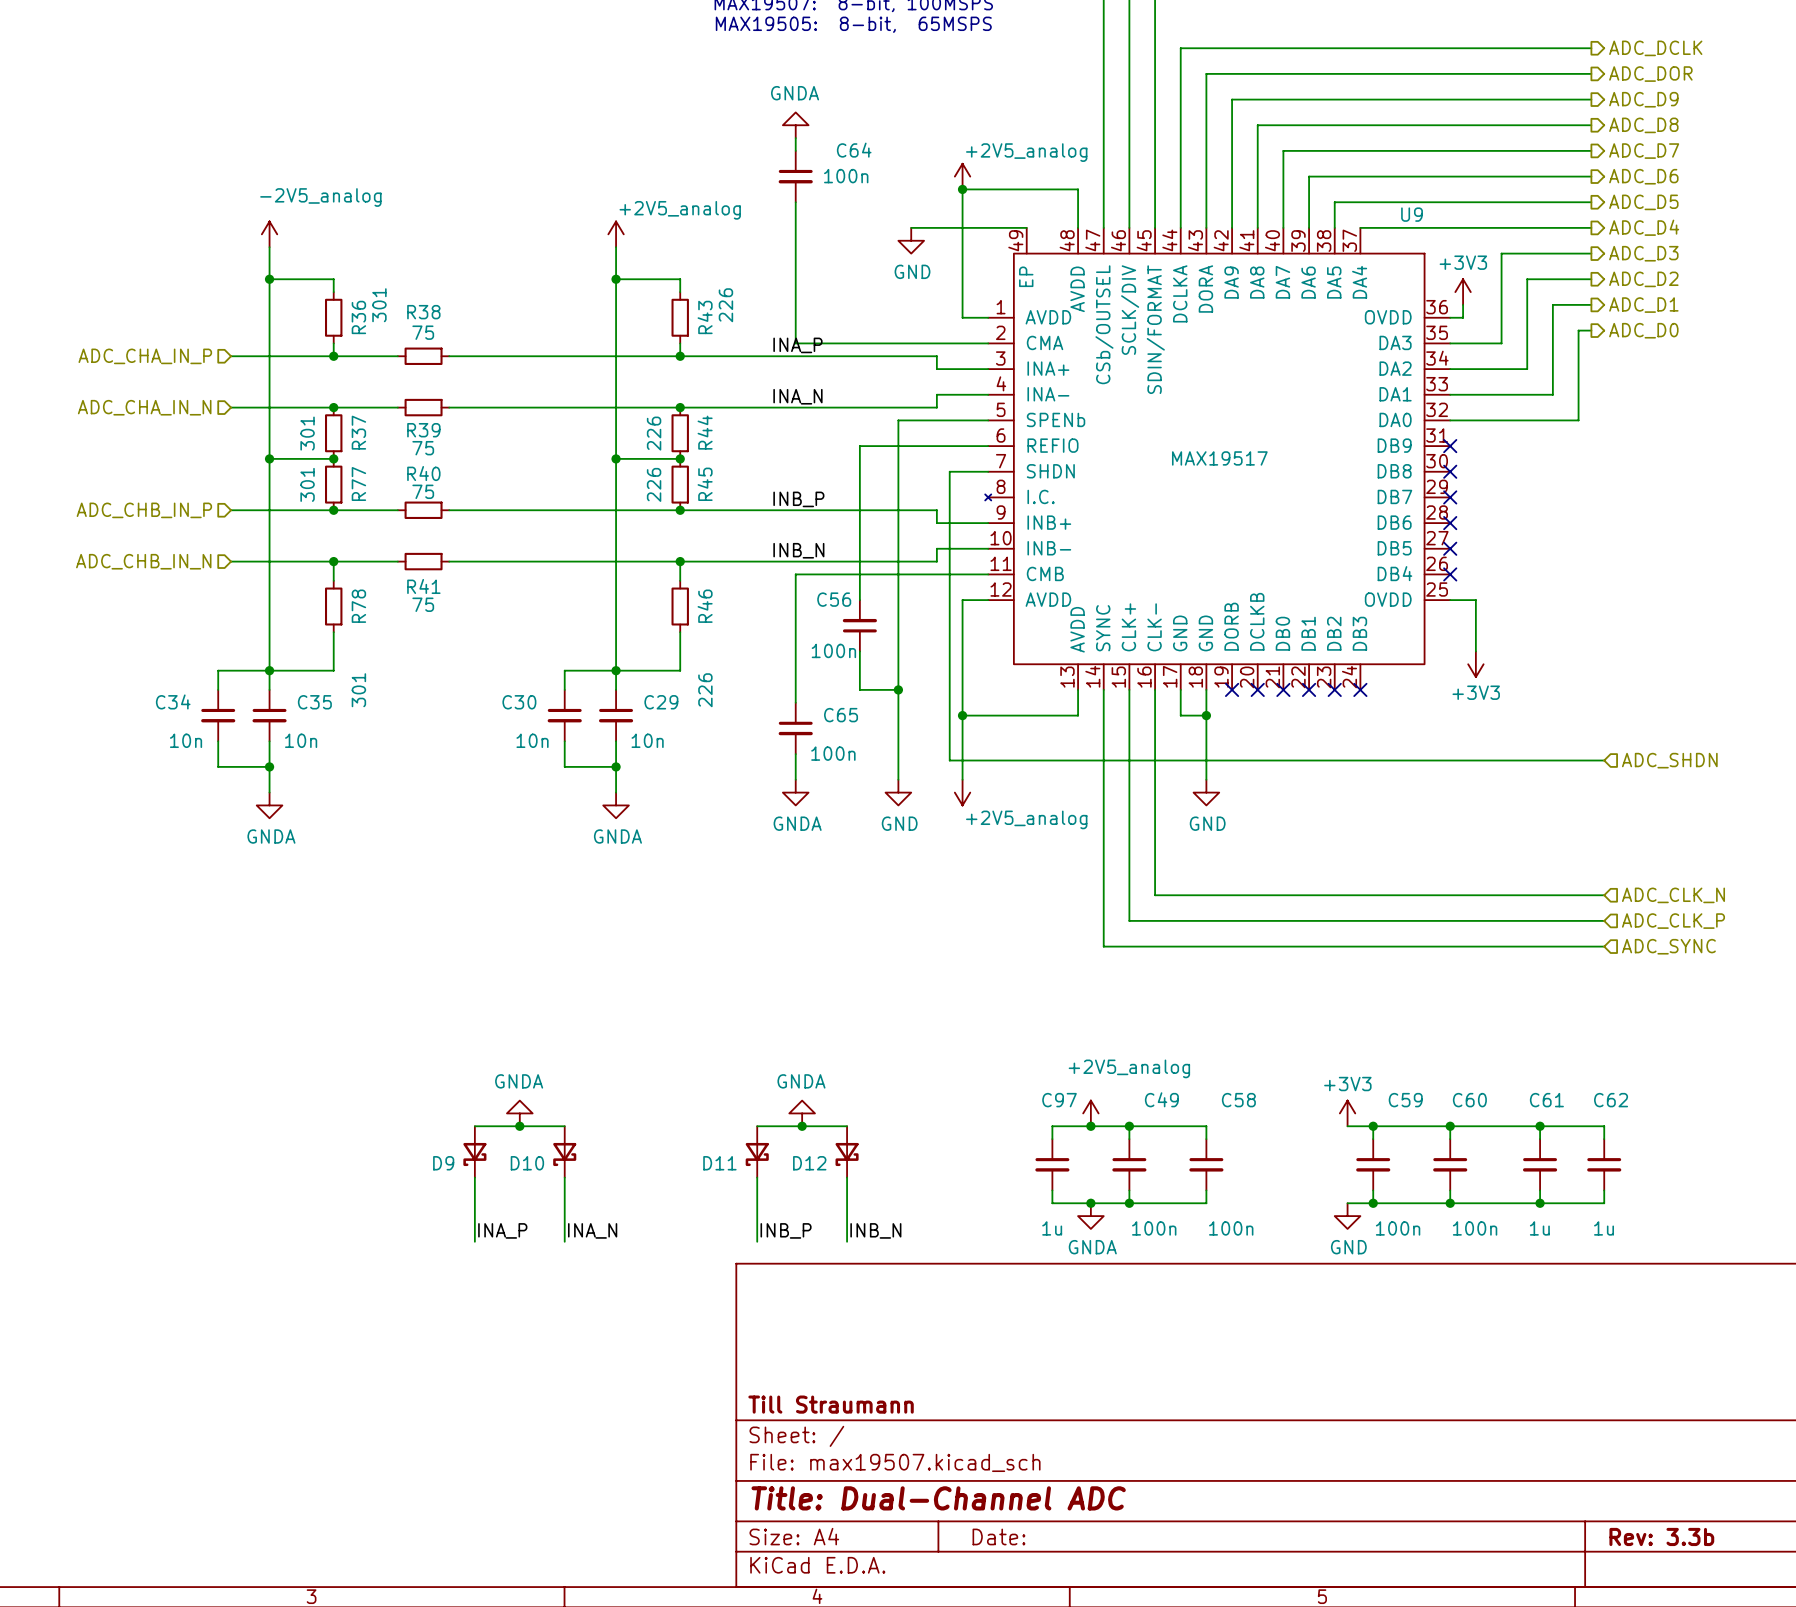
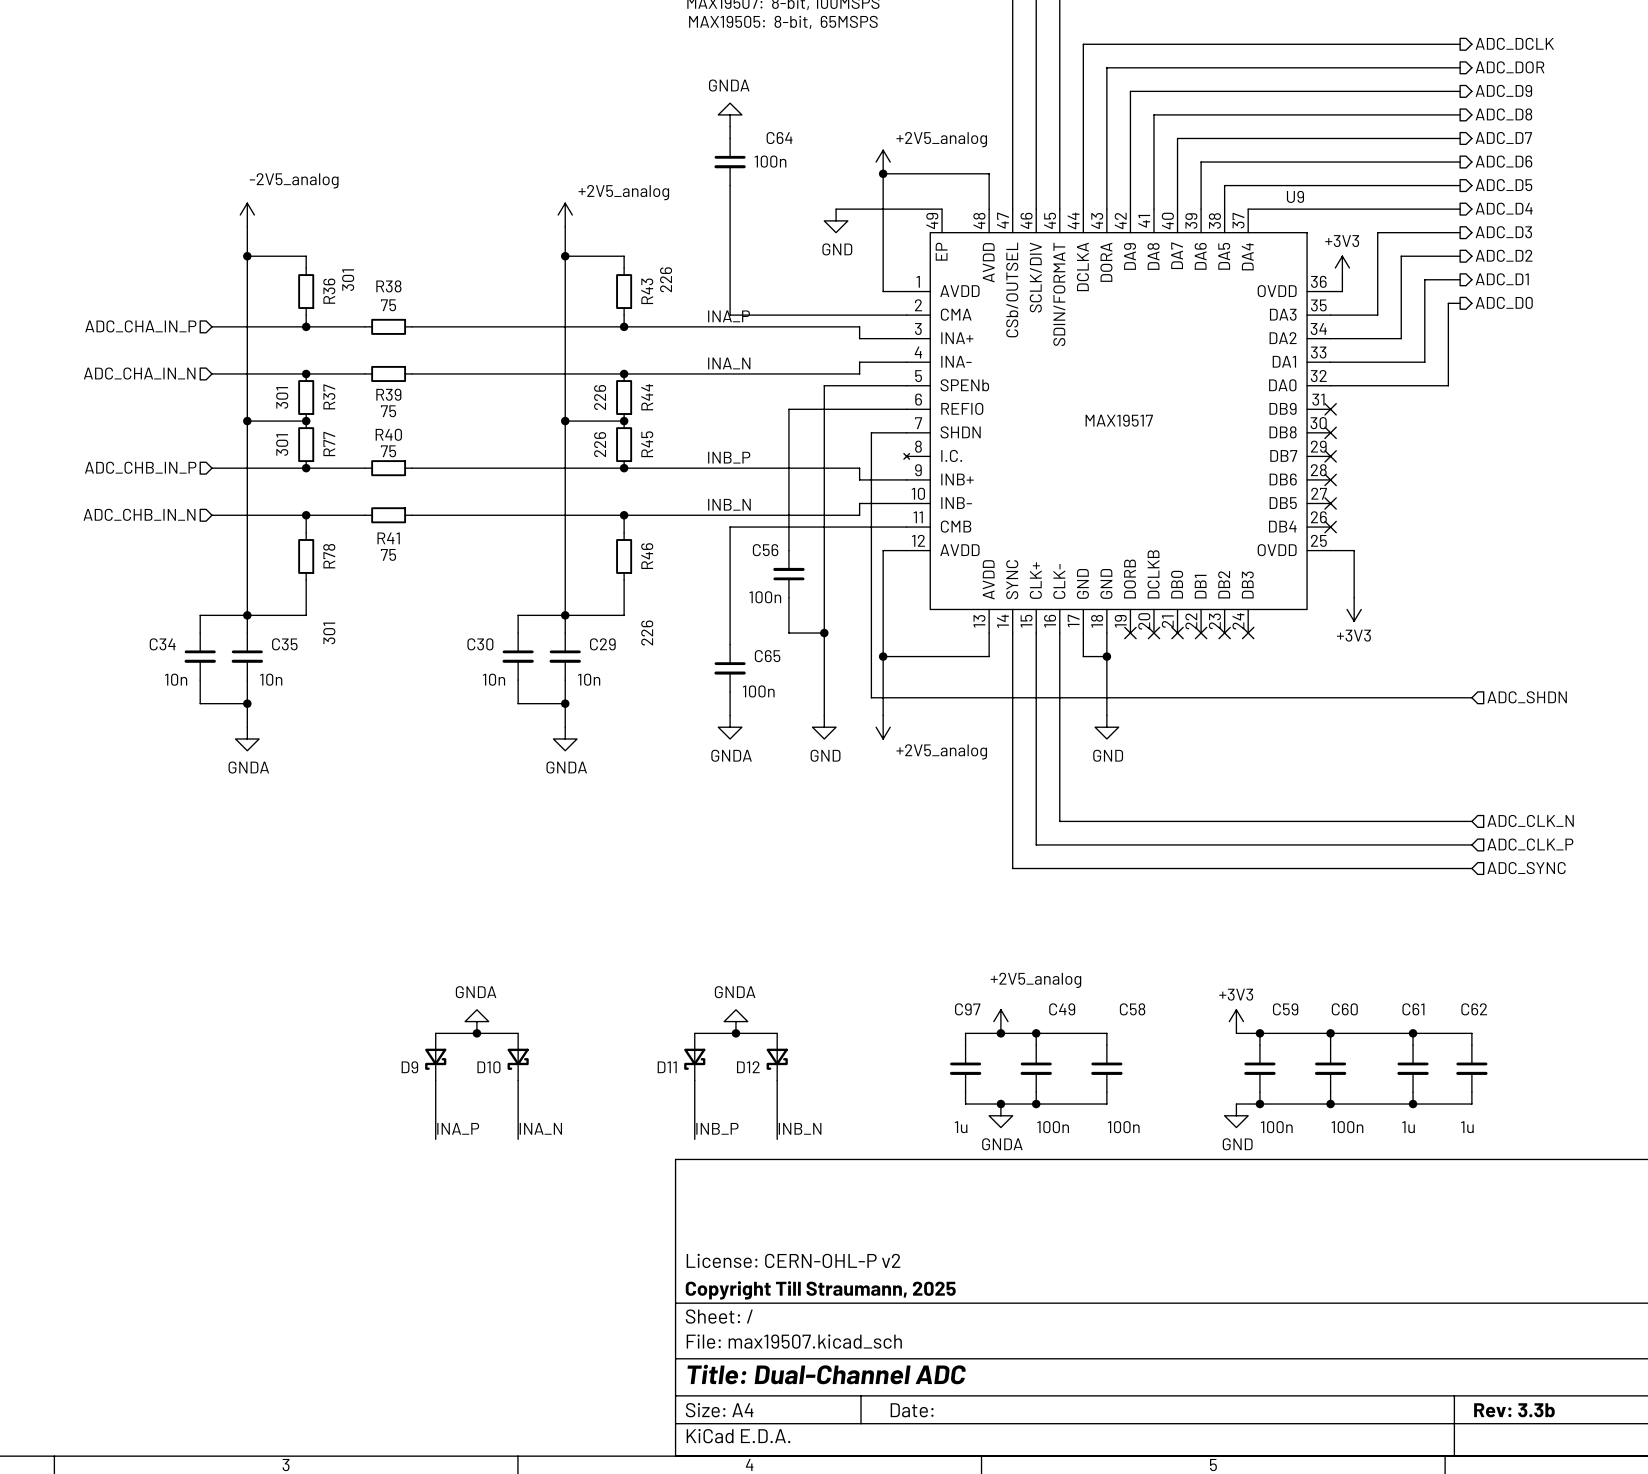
title block: none -> License: CERN-OHL-P v2 (793, 1260)
title block: Till Straumann (831, 1404) -> Copyright Till Straumann, 2025 (820, 1290)

